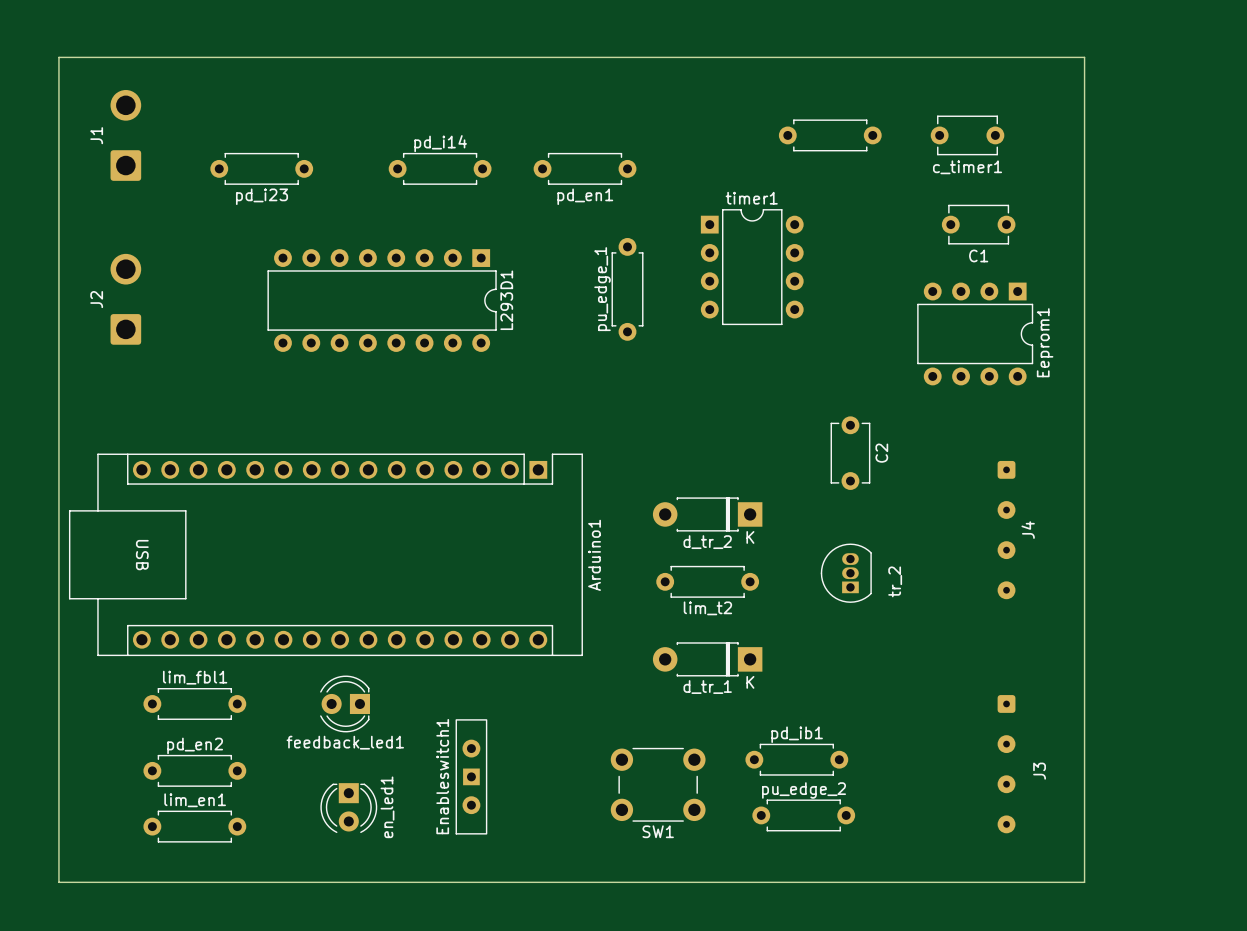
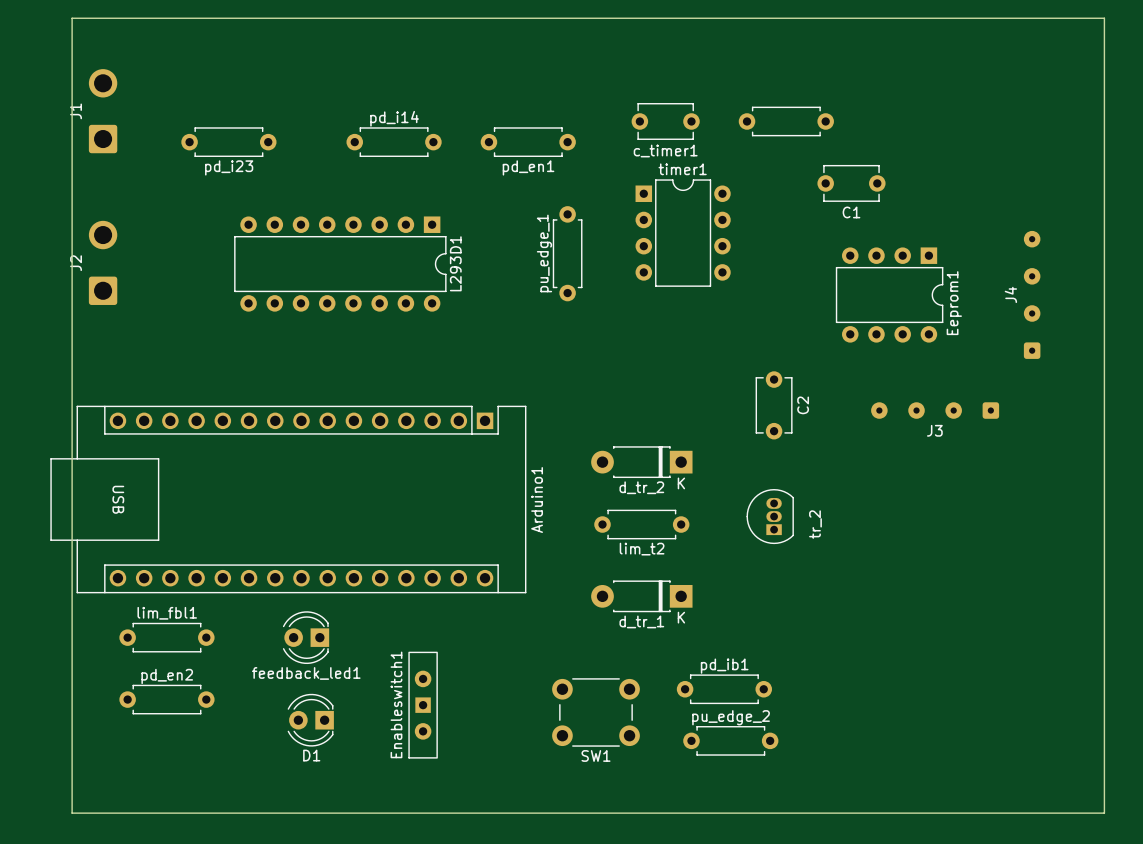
board edge: (58, 57) (1084, 57) (1084, 882) (58, 882) (58, 57) -> (72, 18) (72, 813) (1104, 813) (1104, 18) (72, 18)
part position: (830, 135) -> (786, 121)
c_timer1 position: (967, 135) -> (665, 121)
C1 position: (978, 224) -> (851, 183)
J4 rotation: 0° (1006, 530) -> 180° (1032, 294)
J4 position: (1006, 530) -> (1032, 294)
J3 rotation: 0° (1006, 764) -> 90° clockwise (935, 410)
J3 position: (1006, 764) -> (935, 410)
D1: none -> (310, 720)
en_led1: (348, 808) -> none
lim_en1: (194, 826) -> none

